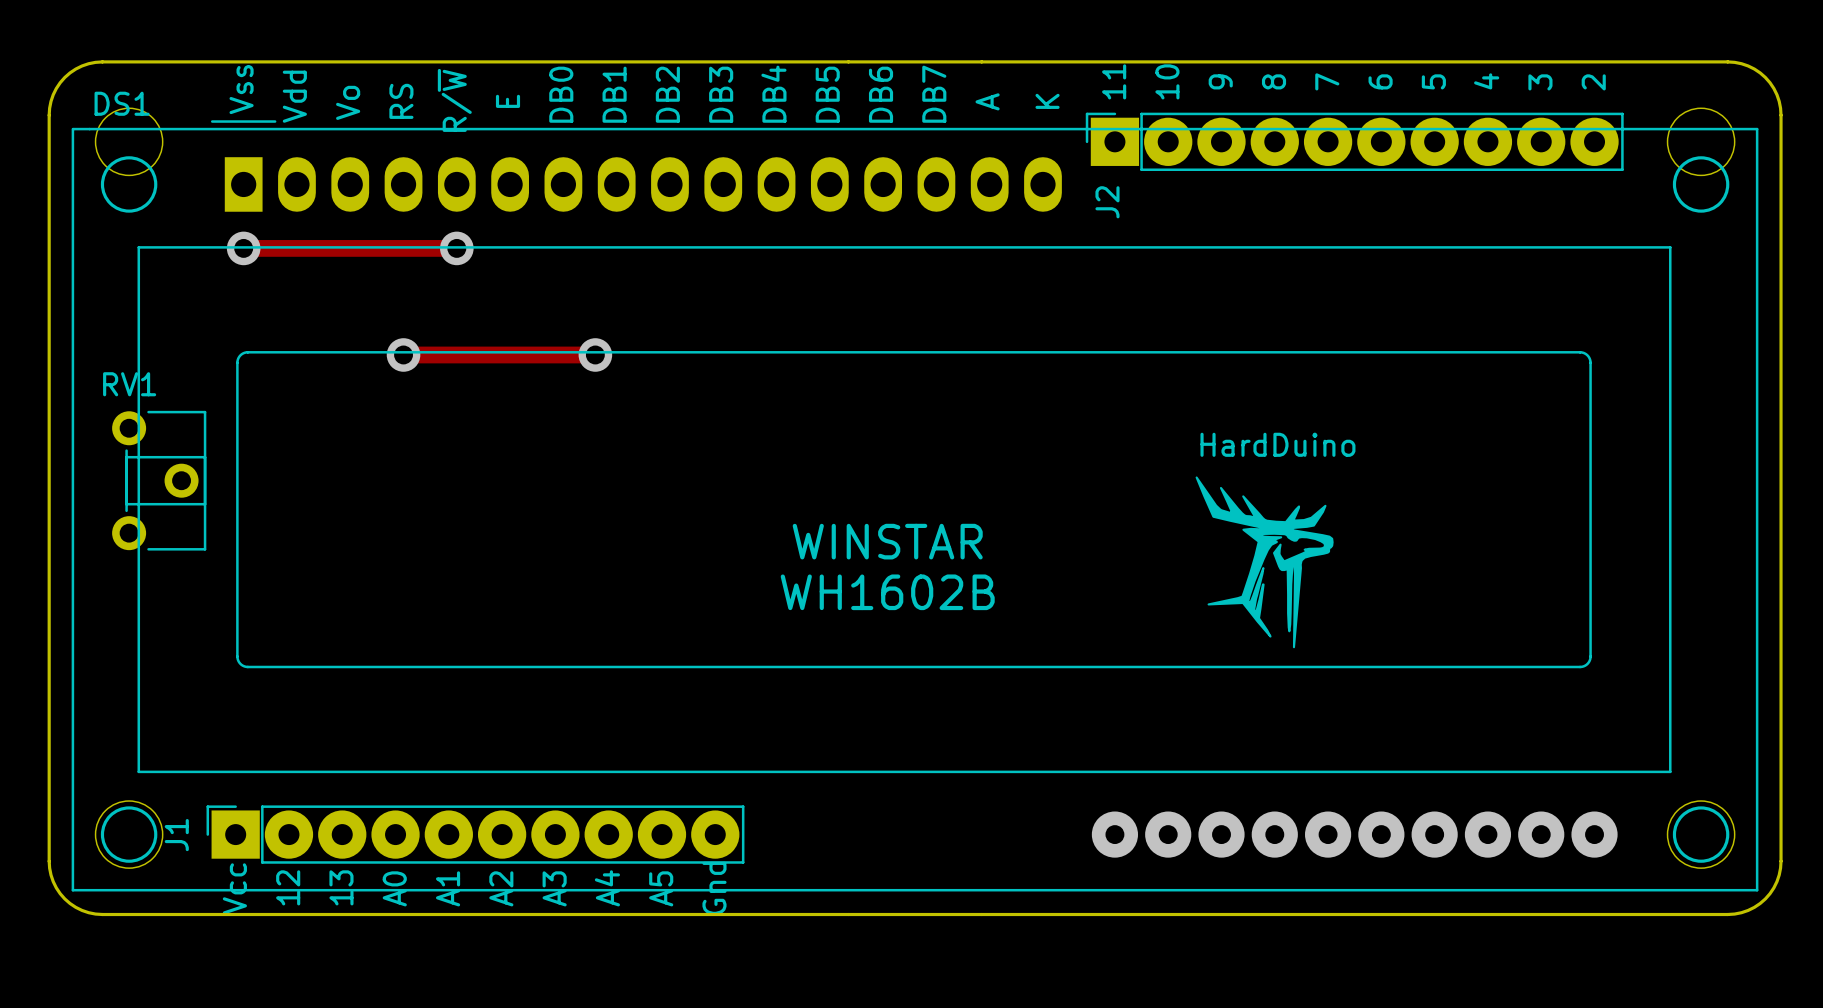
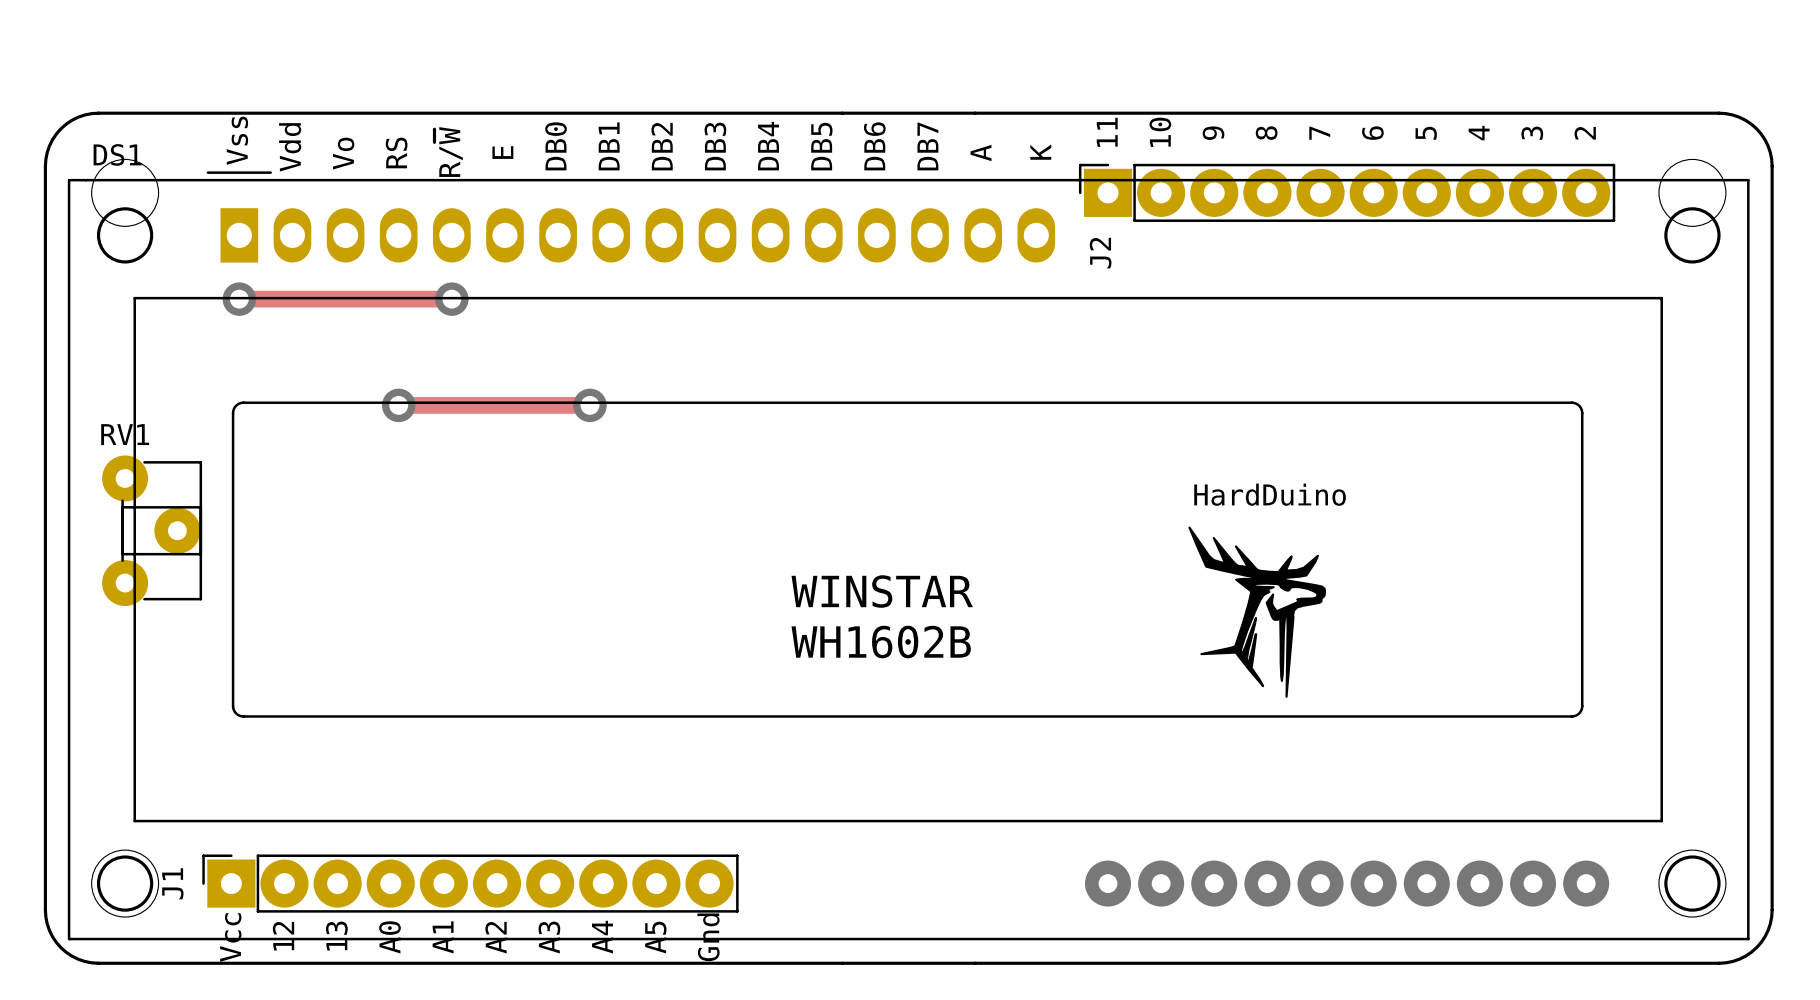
RV1 footprint: [112, 410, 207, 551] -> [102, 455, 203, 607]

